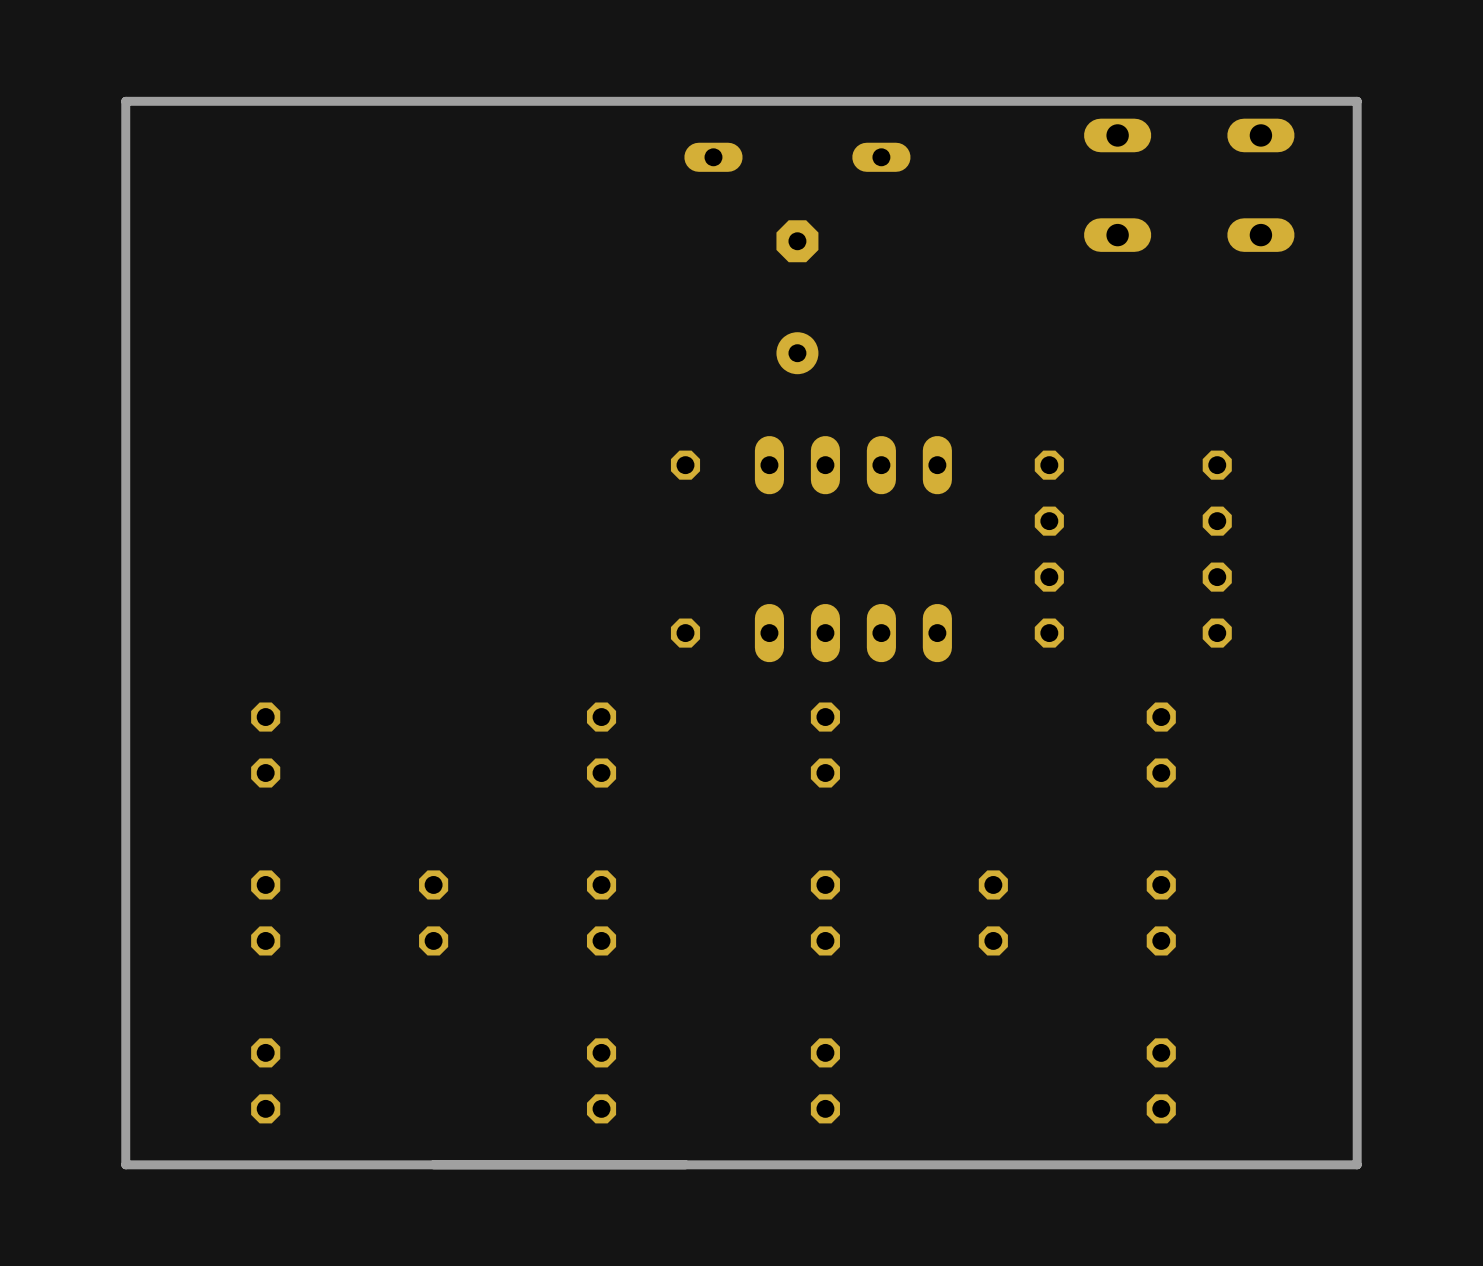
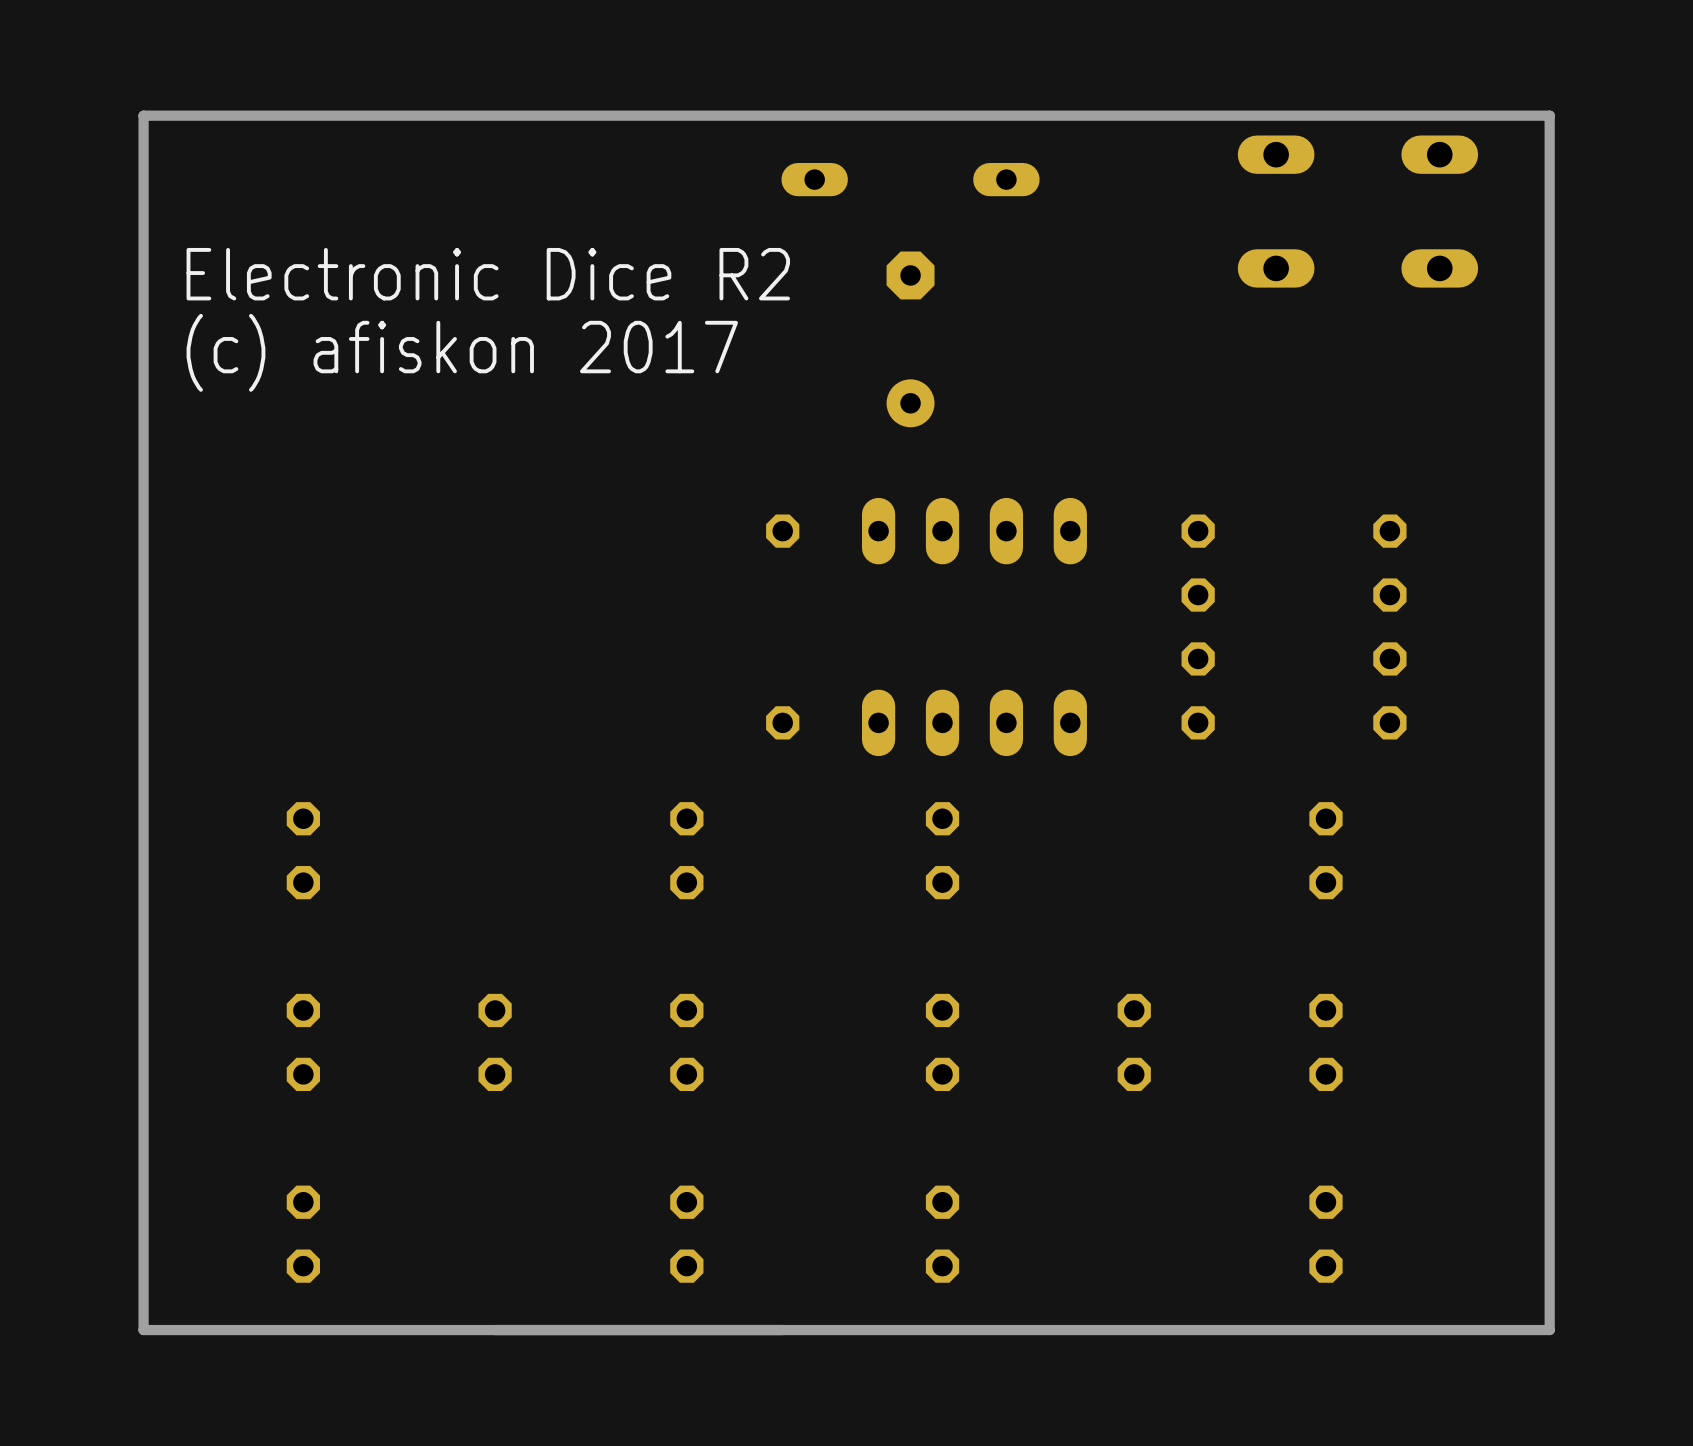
text: none -> Electronic Dice R2 (488, 274)
text: none -> (c) afiskon 2017 (462, 352)

